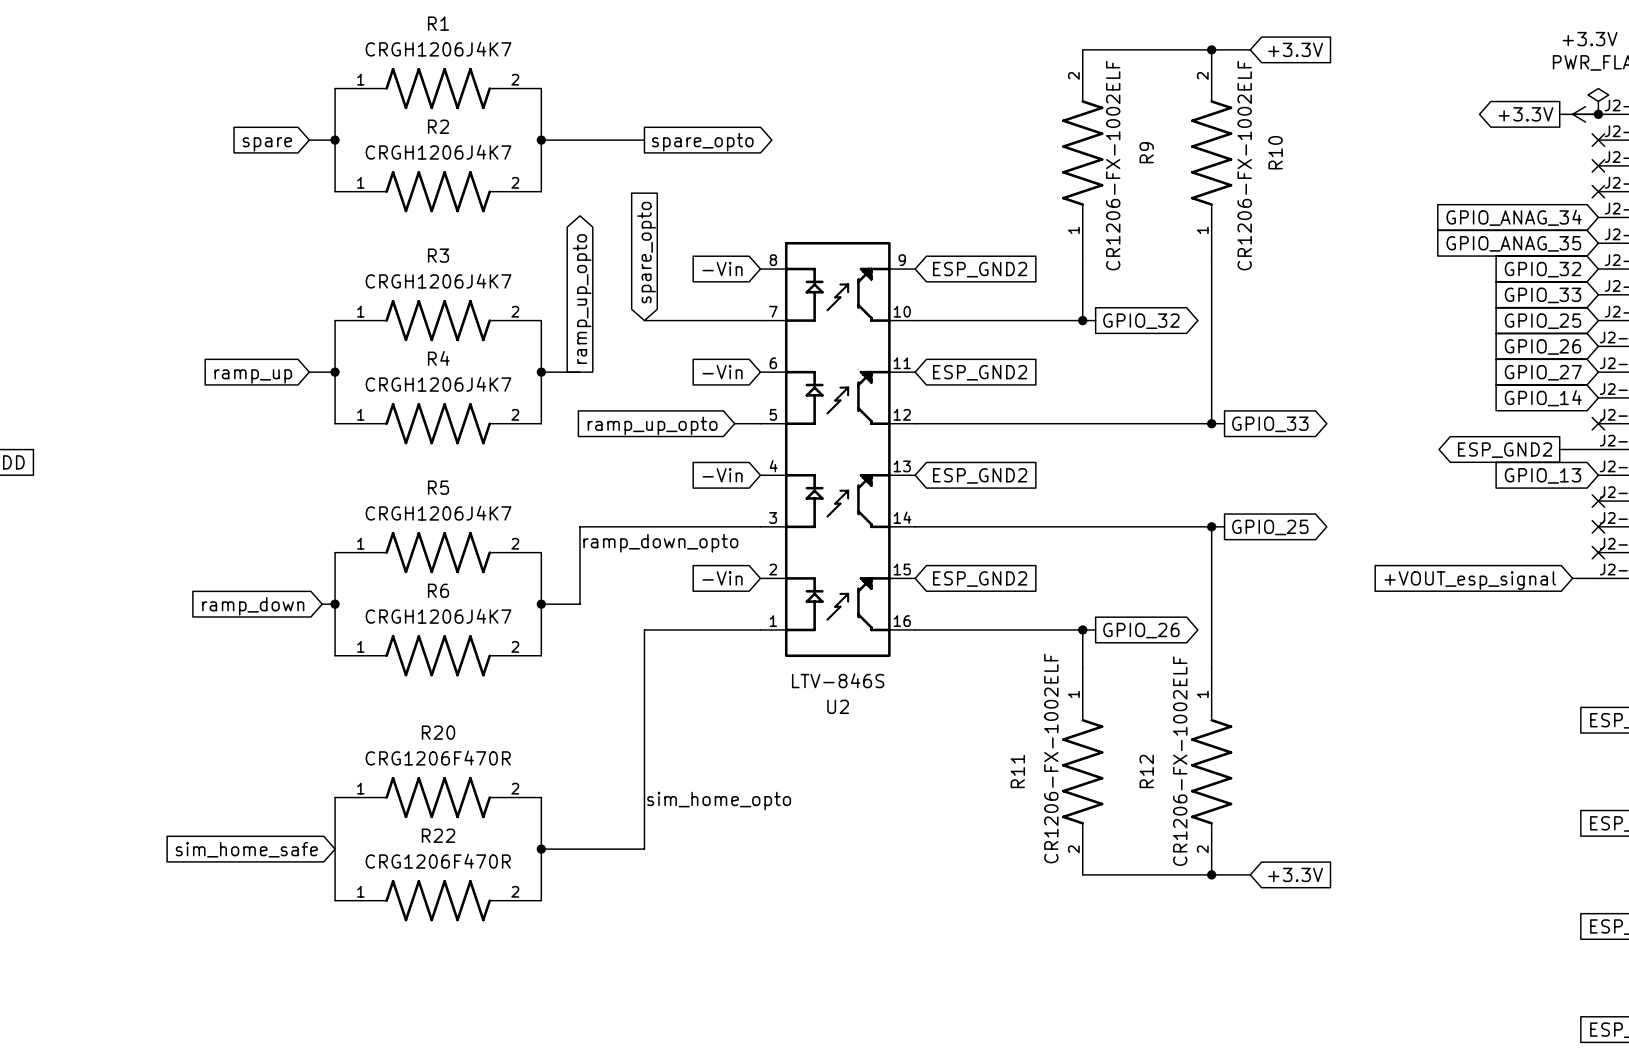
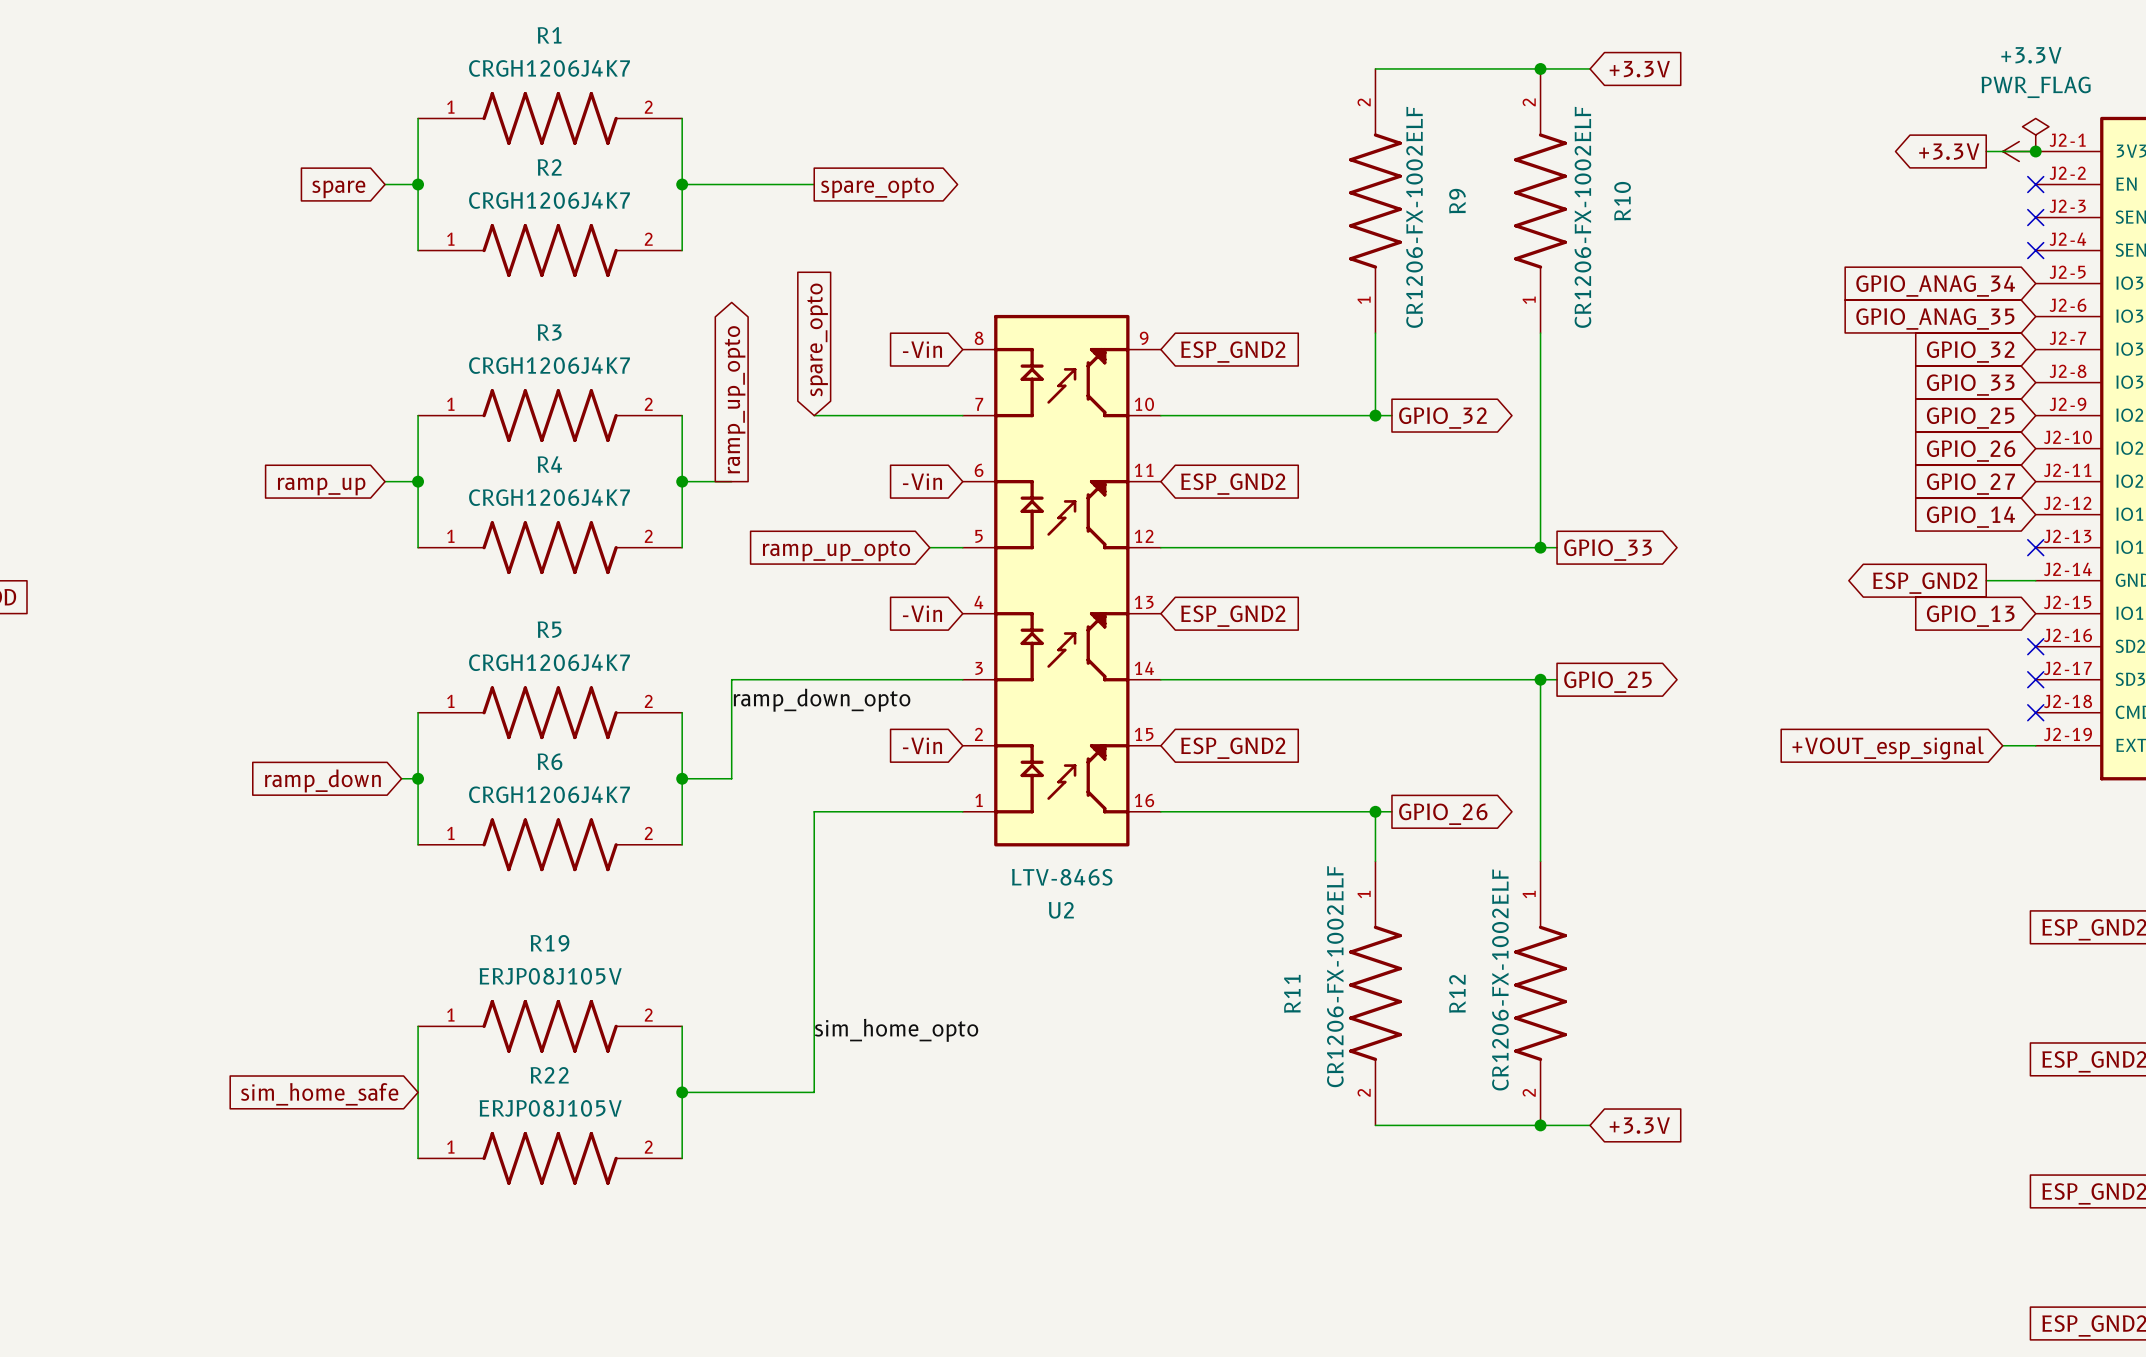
R20 name: R20 (438, 732) -> R19 (549, 943)
R20 value: CRG1206F470R (438, 758) -> ERJP08J105V (550, 976)
R22 value: CRG1206F470R (438, 861) -> ERJP08J105V (550, 1108)

